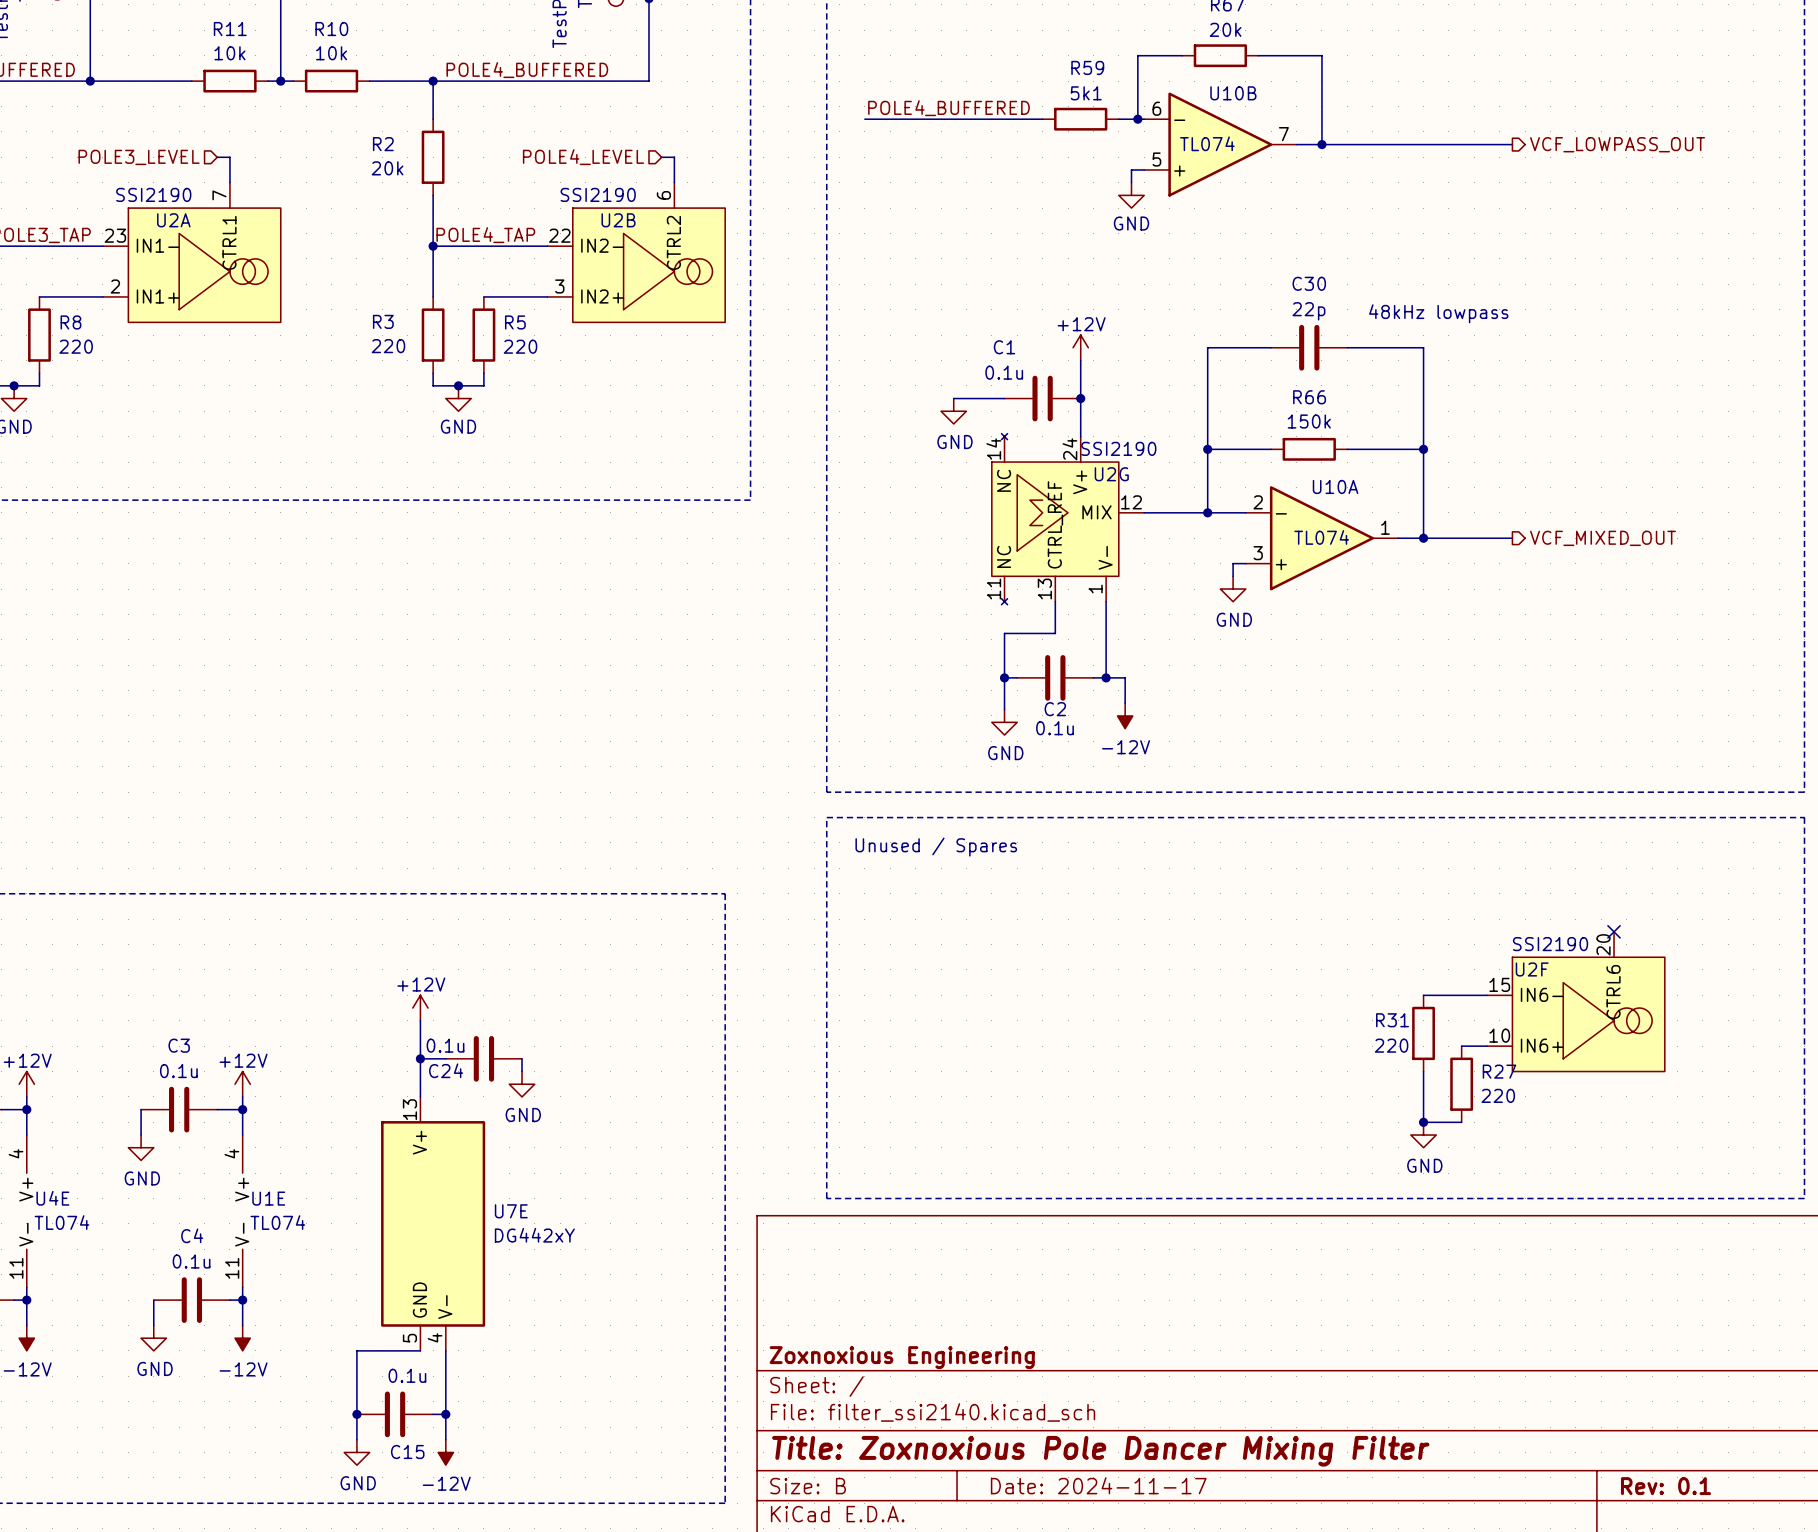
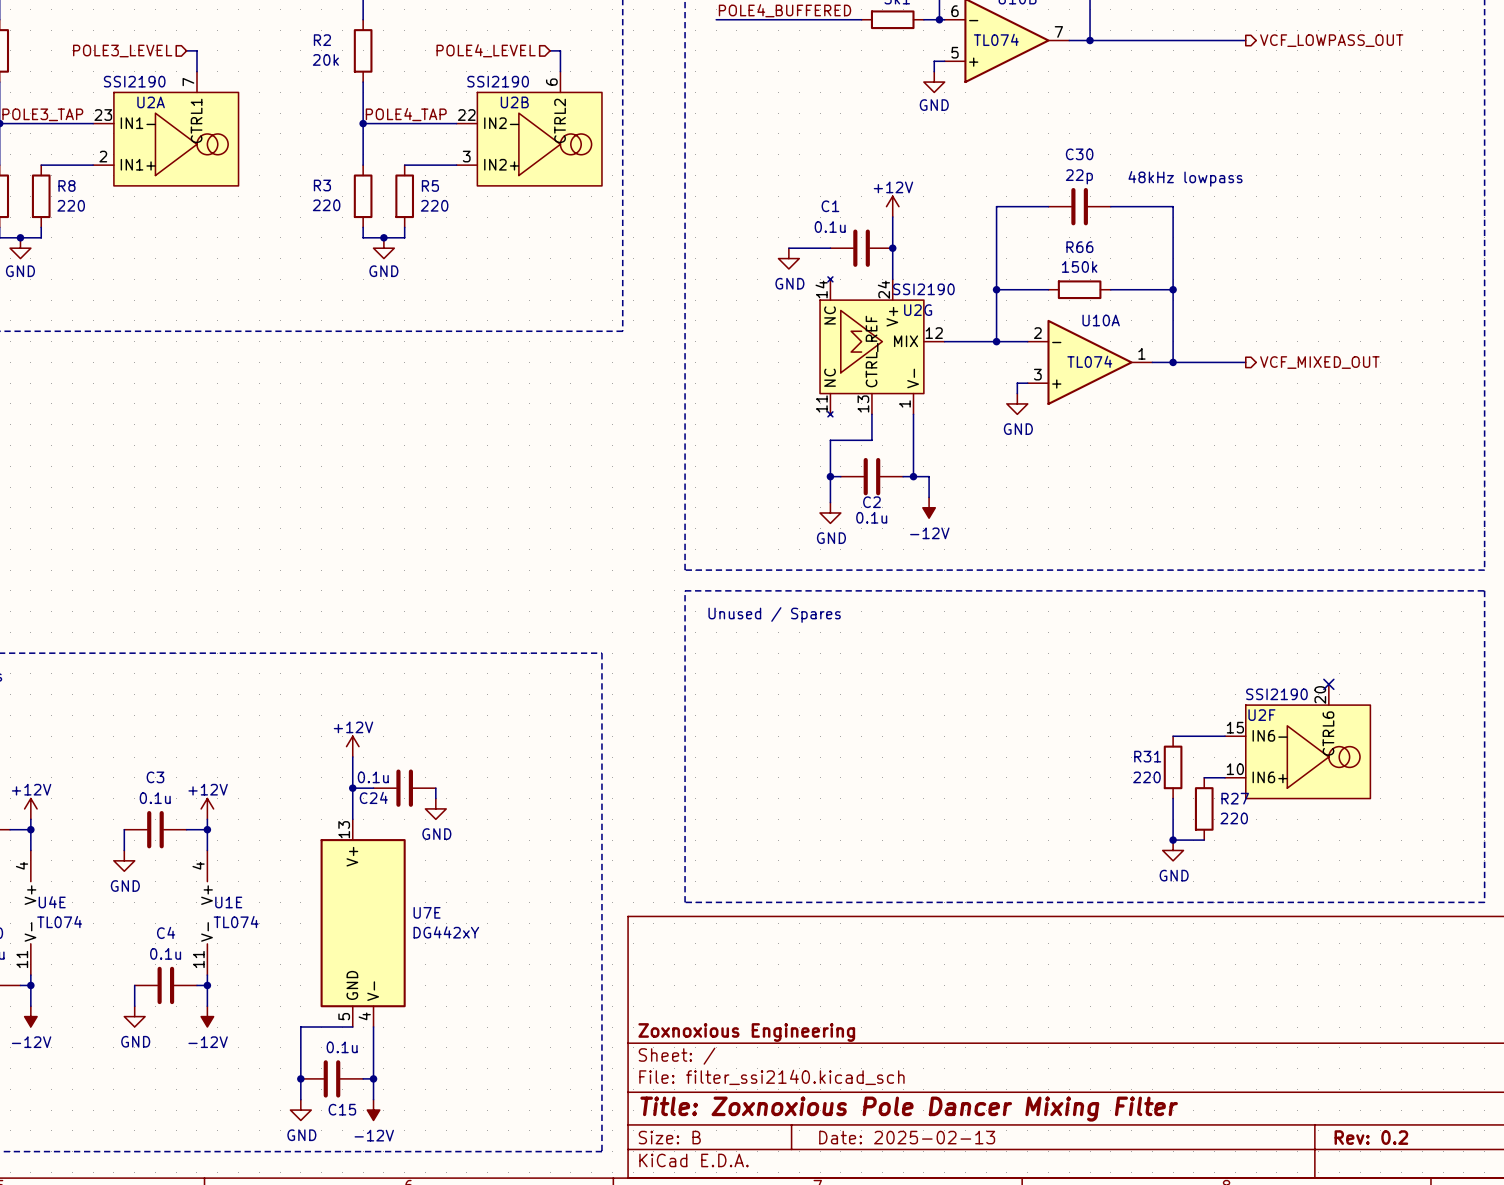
title block: Date: 2024-11-17 (1098, 1485) -> Date: 2025-02-13 (907, 1137)
title block: Rev: 0.1 (1666, 1486) -> Rev: 0.2 (1371, 1137)

